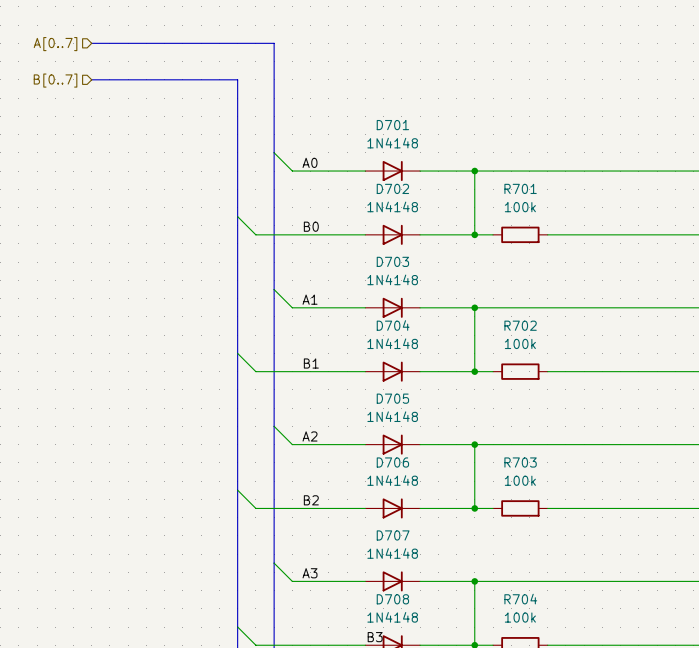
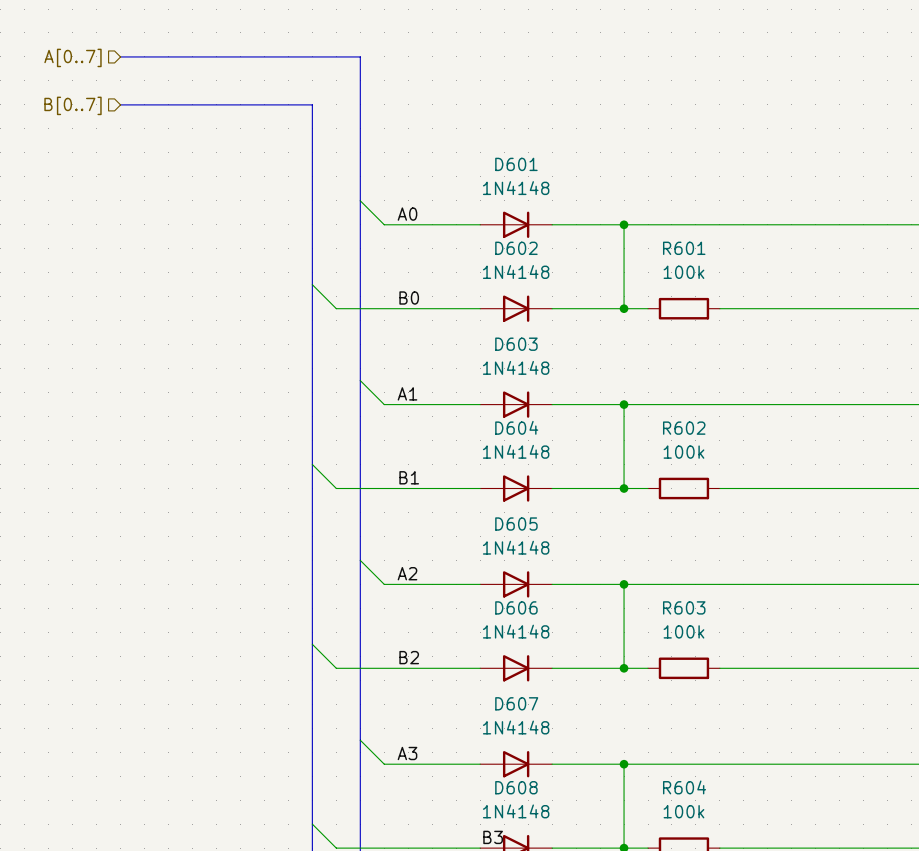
D701 name: D701 (392, 125) -> D601 (516, 164)
D702 name: D702 (392, 188) -> D602 (516, 248)
R701 name: R701 (520, 188) -> R601 (684, 248)
D703 name: D703 (392, 261) -> D603 (516, 344)
D704 name: D704 (393, 325) -> D604 (516, 427)
R702 name: R702 (520, 325) -> R602 (684, 428)
D705 name: D705 (392, 398) -> D605 (516, 524)
D706 name: D706 (392, 462) -> D606 (516, 607)
R703 name: R703 (520, 462) -> R603 (684, 607)
D707 name: D707 (393, 535) -> D607 (516, 703)
D708 name: D708 (392, 599) -> D608 (516, 787)
R704 name: R704 (520, 599) -> R604 (684, 787)

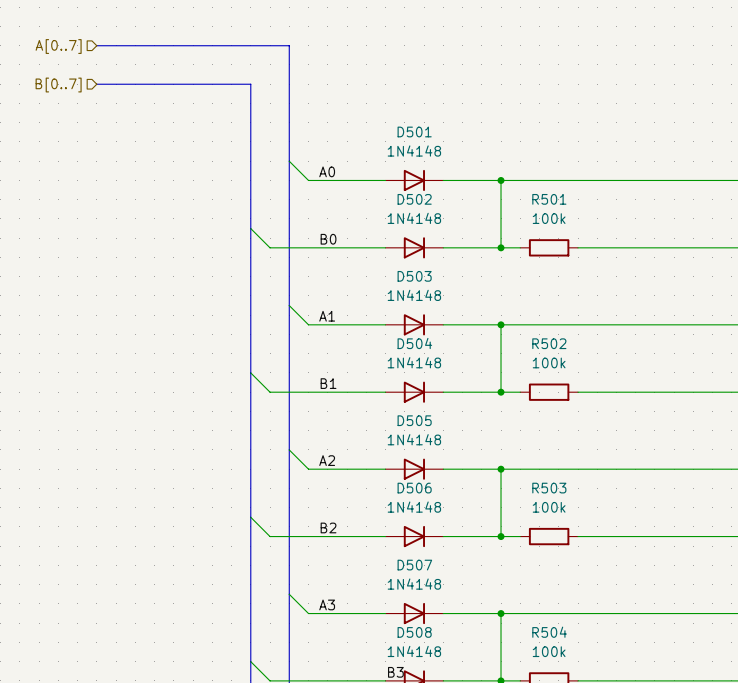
D601 name: D601 (516, 164) -> D501 (414, 131)
D602 name: D602 (516, 248) -> D502 (414, 199)
R601 name: R601 (684, 248) -> R501 (549, 199)
D603 name: D603 (516, 344) -> D503 (414, 276)
D604 name: D604 (516, 427) -> D504 (414, 343)
R602 name: R602 (684, 428) -> R502 (549, 343)
D605 name: D605 (516, 524) -> D505 (414, 420)
D606 name: D606 (516, 607) -> D506 (414, 488)
R603 name: R603 (684, 607) -> R503 (549, 488)
D607 name: D607 (516, 703) -> D507 (414, 565)
D608 name: D608 (516, 787) -> D508 (414, 632)
R604 name: R604 (684, 787) -> R504 (549, 632)

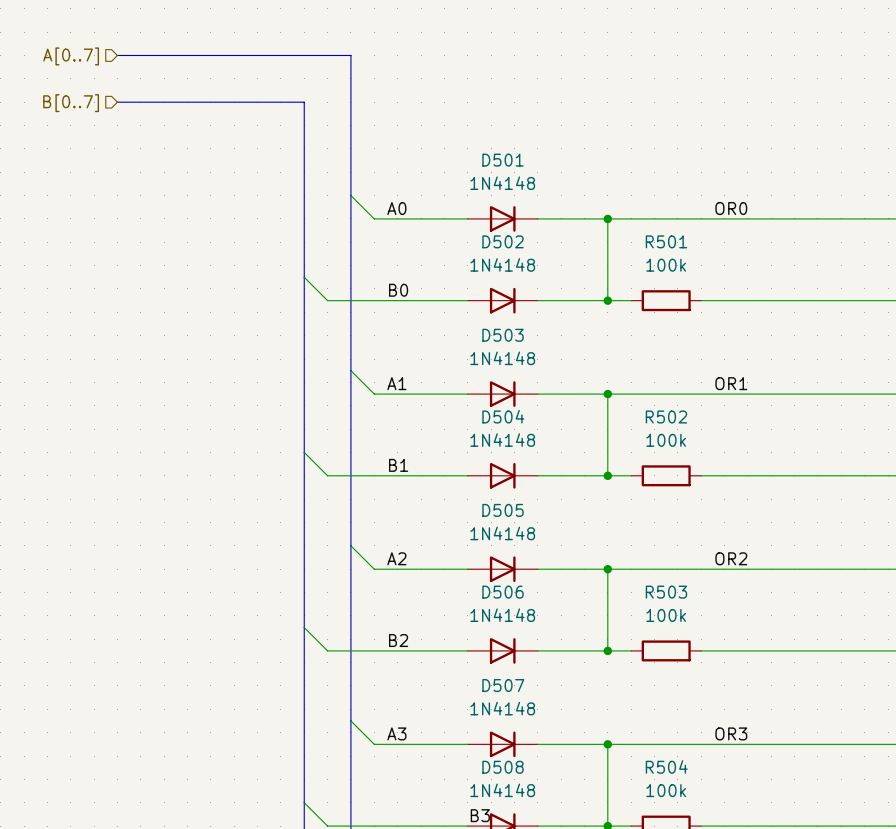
label: none -> OR0 (731, 208)
label: none -> OR1 (731, 383)
label: none -> OR2 (731, 558)
label: none -> OR3 (731, 733)

